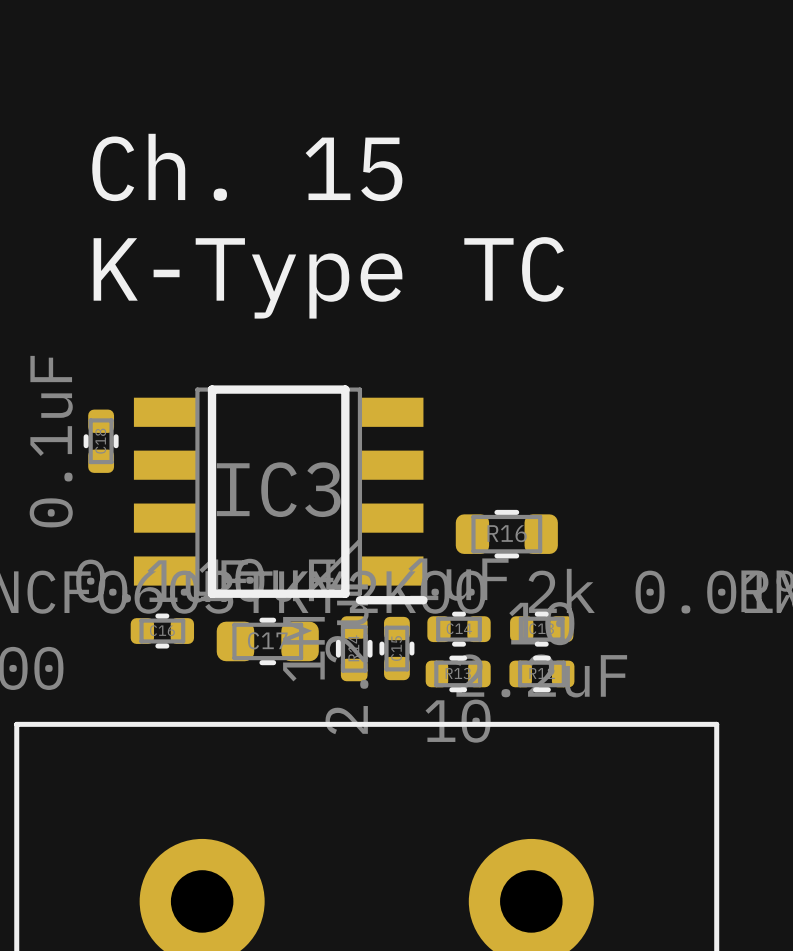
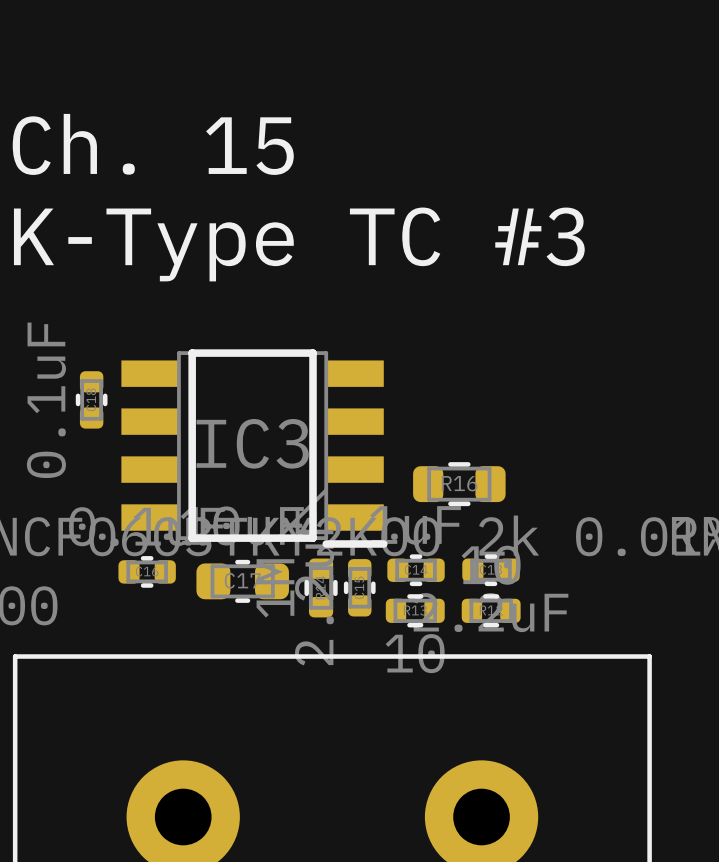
text position: Ch. 15 (247, 167) -> Ch. 15 (153, 144)
text: K-Type TC (328, 277) -> K-Type TC #3 (299, 244)

